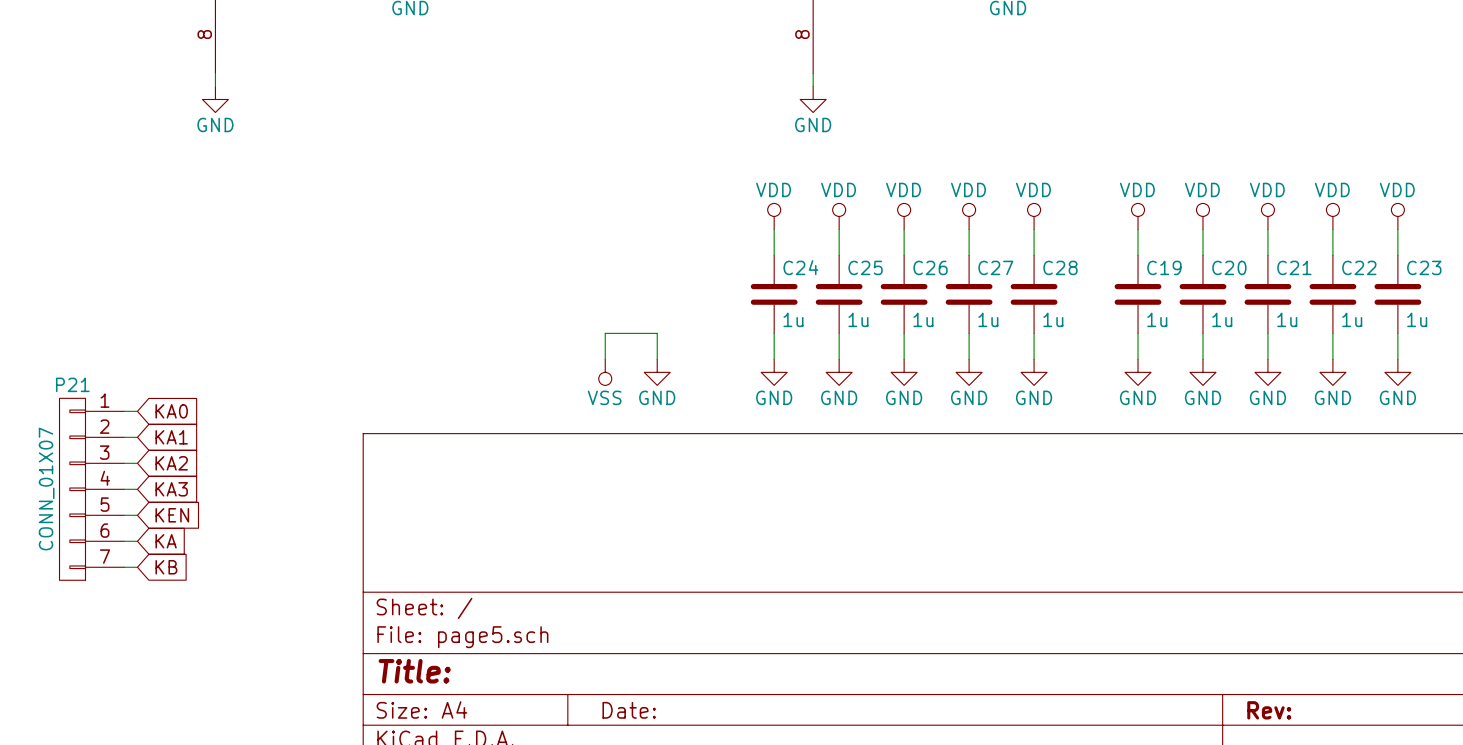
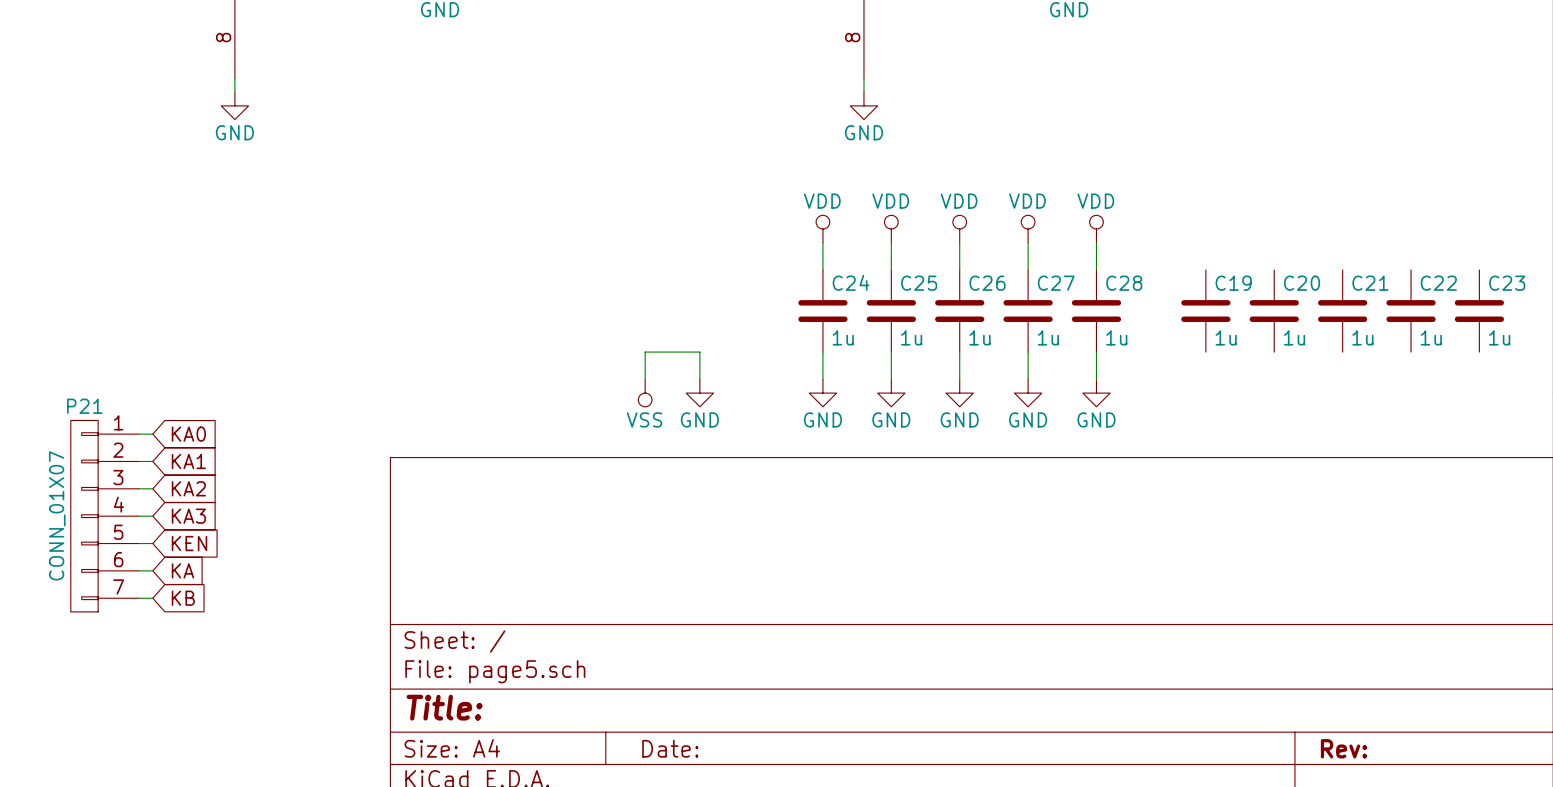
power symbol: VDD (1138, 216) -> none
power symbol: VDD (1202, 216) -> none
power symbol: VDD (1267, 216) -> none
power symbol: VDD (1332, 216) -> none
power symbol: VDD (1397, 216) -> none
wire: (1138, 229) (1138, 255) -> none
wire: (1202, 229) (1202, 255) -> none
wire: (1267, 229) (1267, 255) -> none
wire: (1332, 229) (1332, 255) -> none
wire: (1397, 229) (1397, 255) -> none
wire: (1138, 333) (1138, 359) -> none
wire: (1202, 333) (1202, 359) -> none
wire: (1267, 333) (1267, 359) -> none
wire: (1332, 333) (1332, 359) -> none
wire: (1397, 333) (1397, 359) -> none
power symbol: GND (1138, 372) -> none
power symbol: GND (1202, 372) -> none
power symbol: GND (1267, 372) -> none
power symbol: GND (1332, 372) -> none
power symbol: GND (1397, 372) -> none

